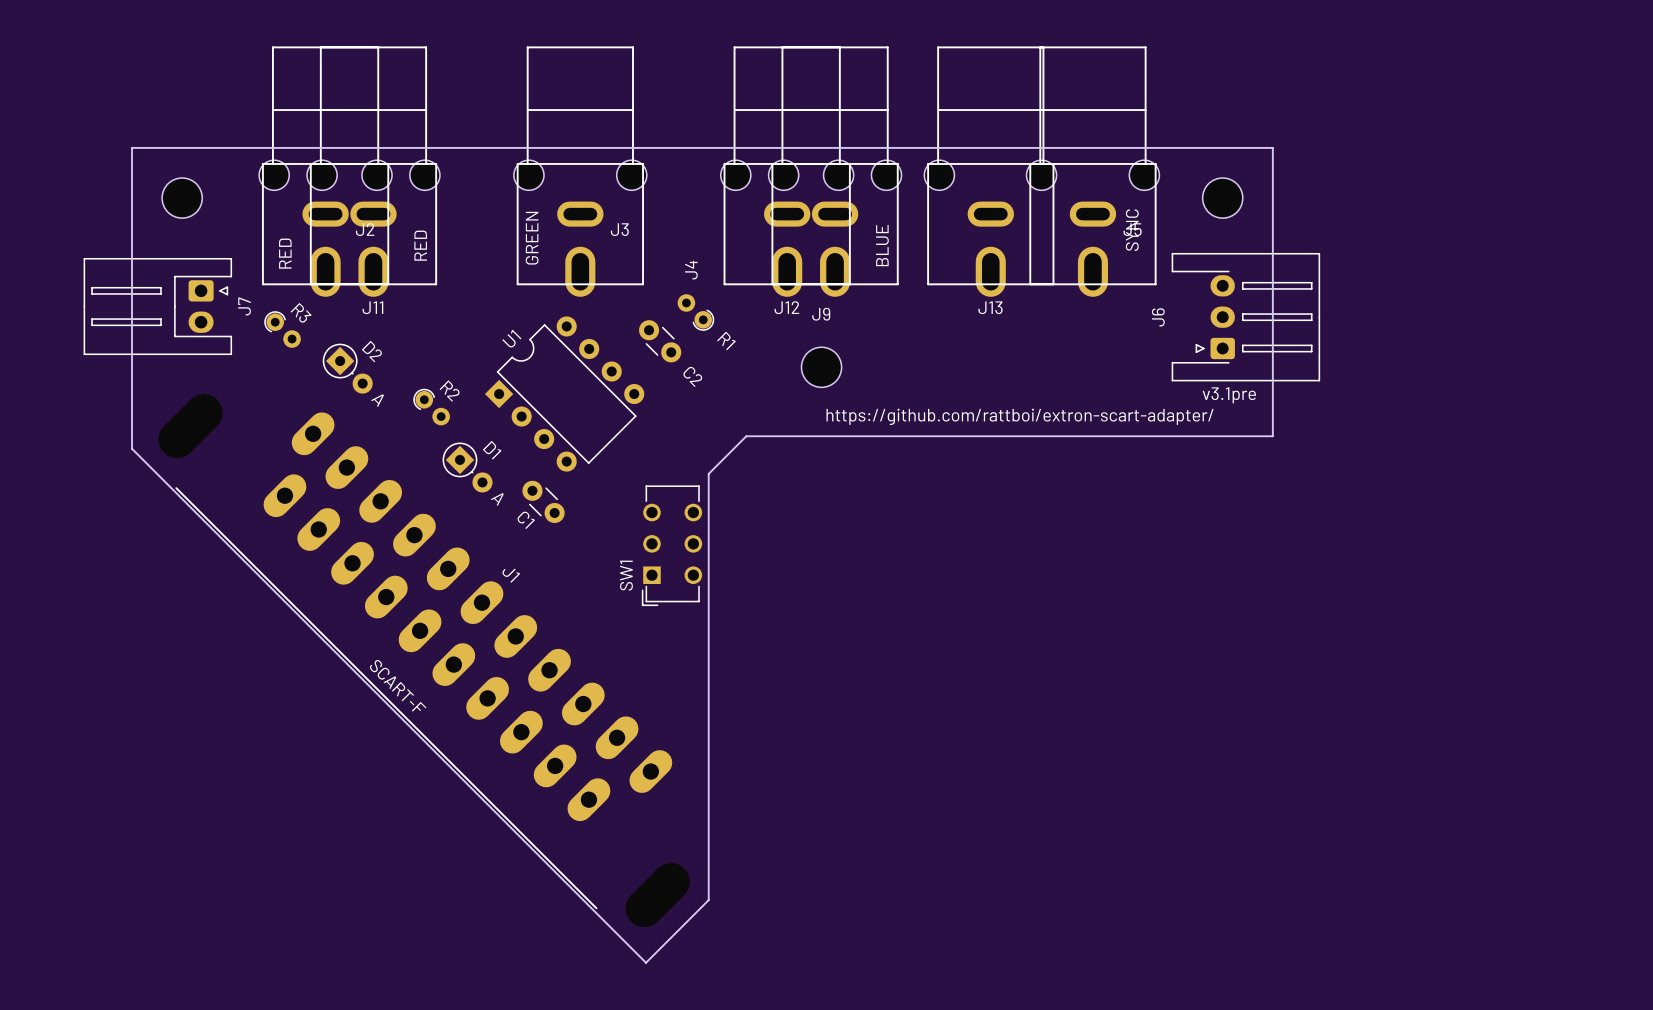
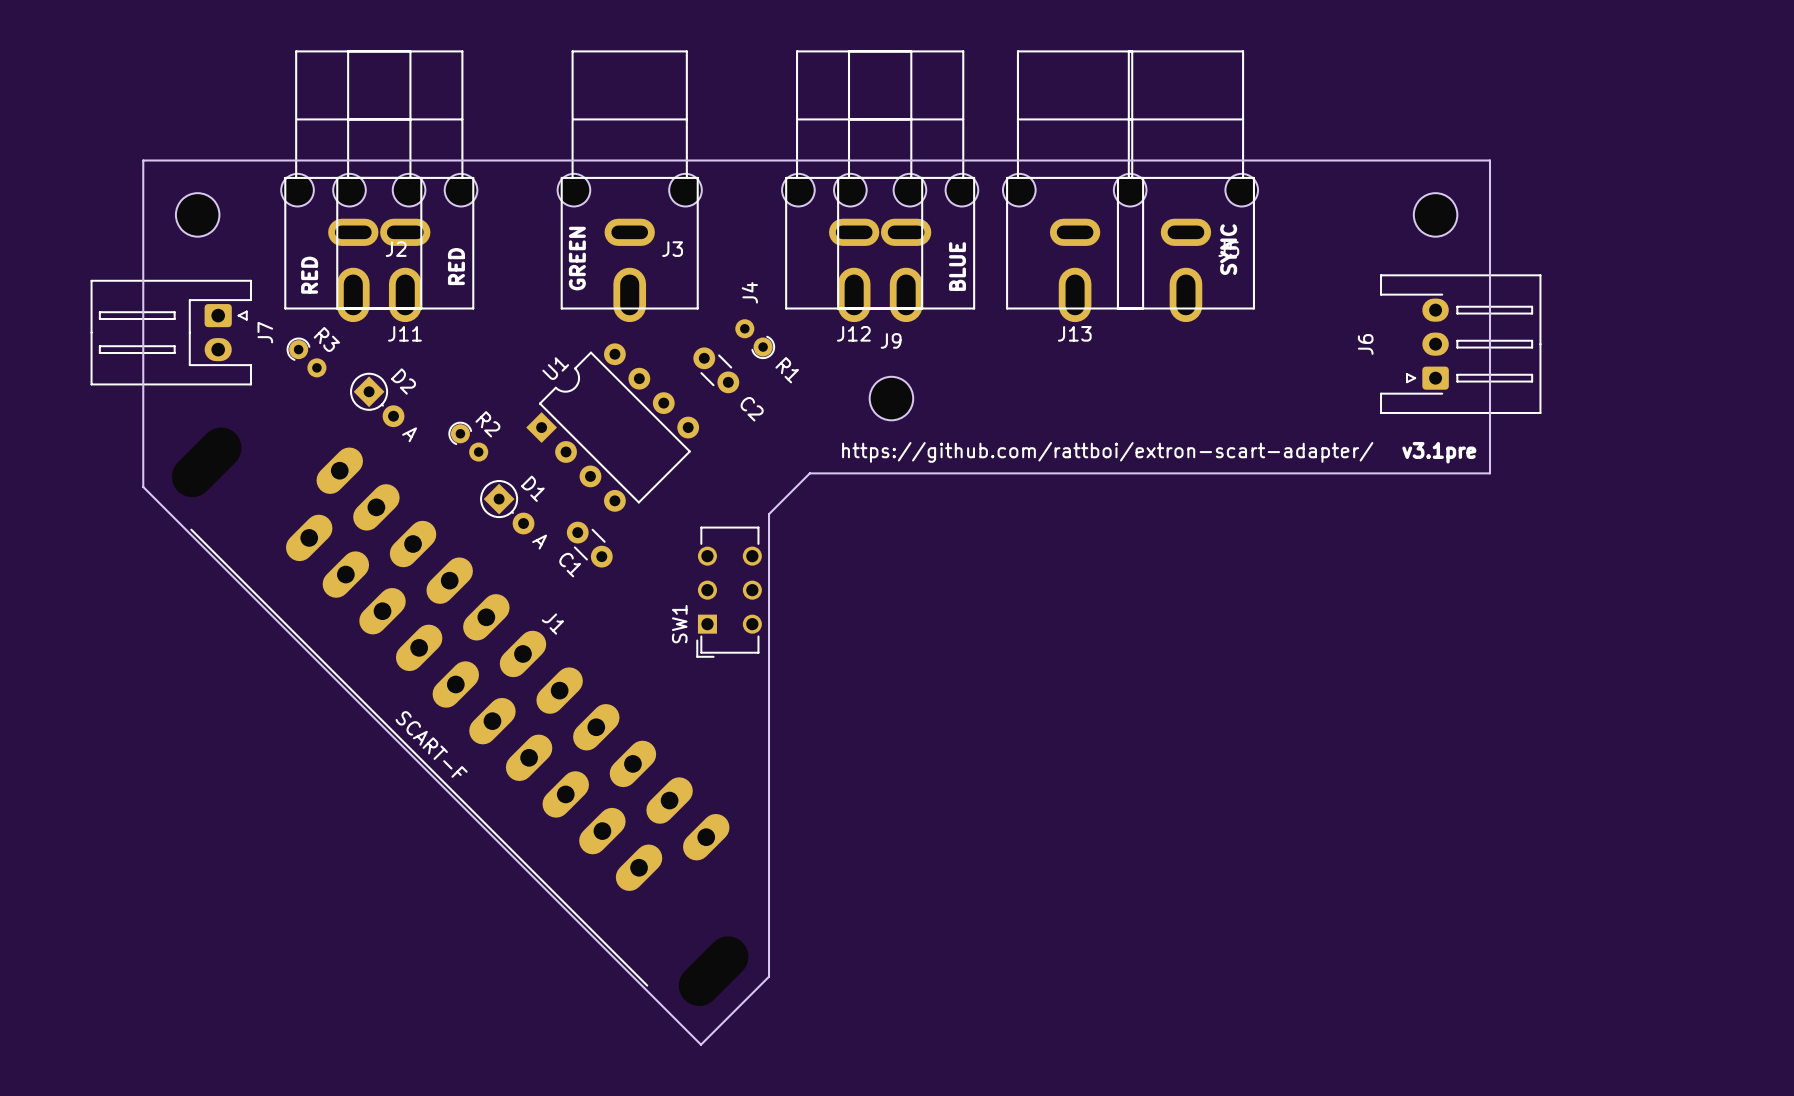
board edge: (1272, 147) (1272, 436) -> (1381, 160) (1489, 160) (1489, 473) (1381, 473)
part position: (1222, 198) -> (1435, 214)
J6 position: (1245, 317) -> (1460, 344)
text position: v3.1pre (1229, 395) -> v3.1pre (1439, 452)

